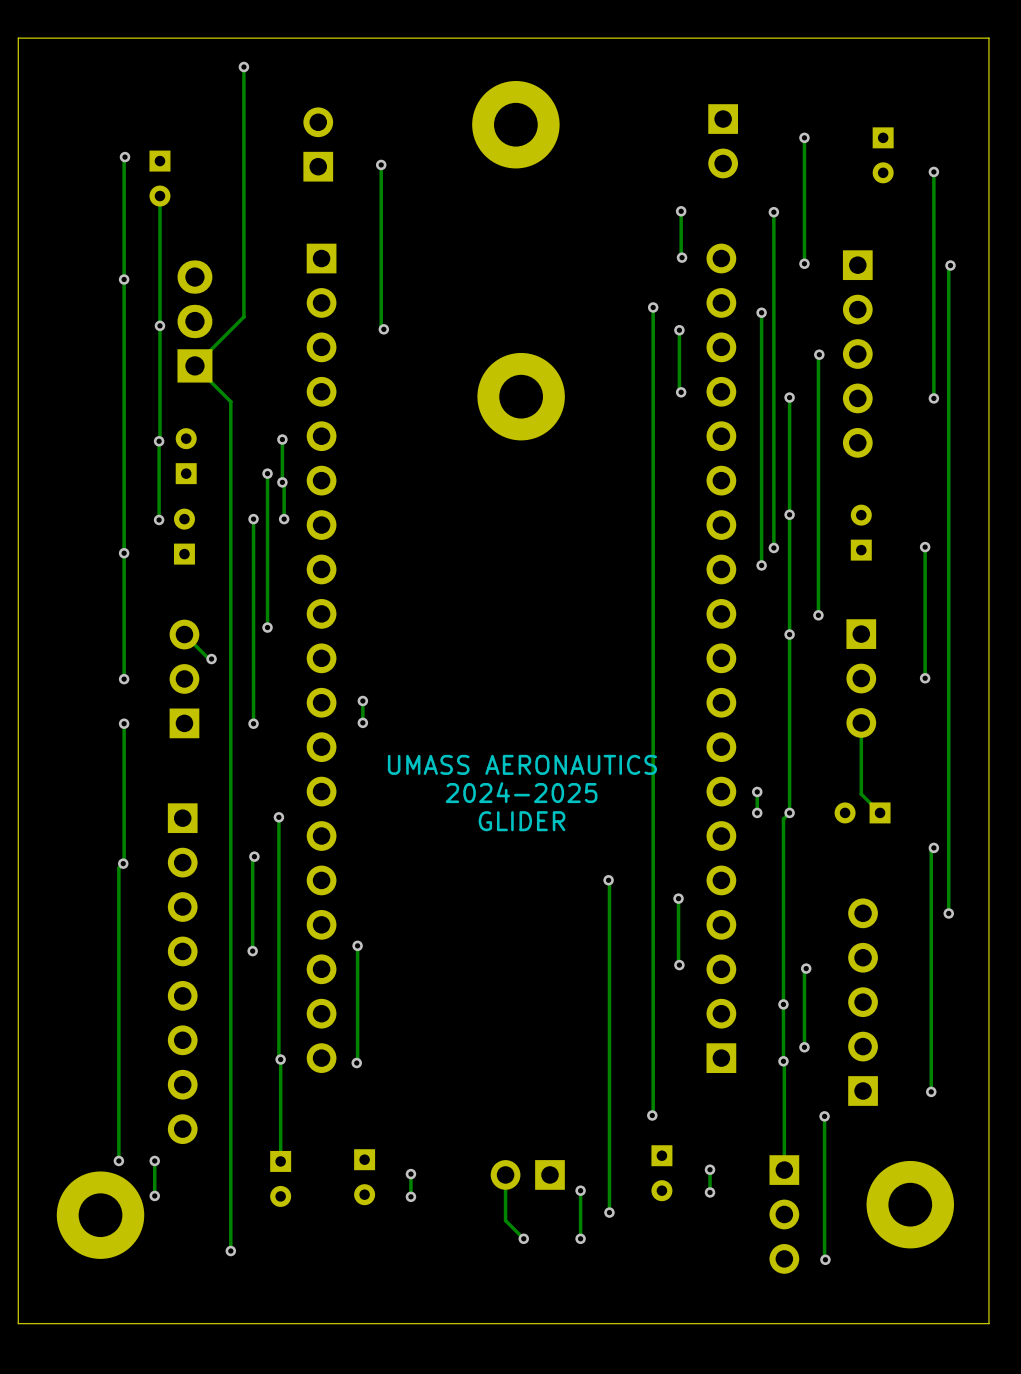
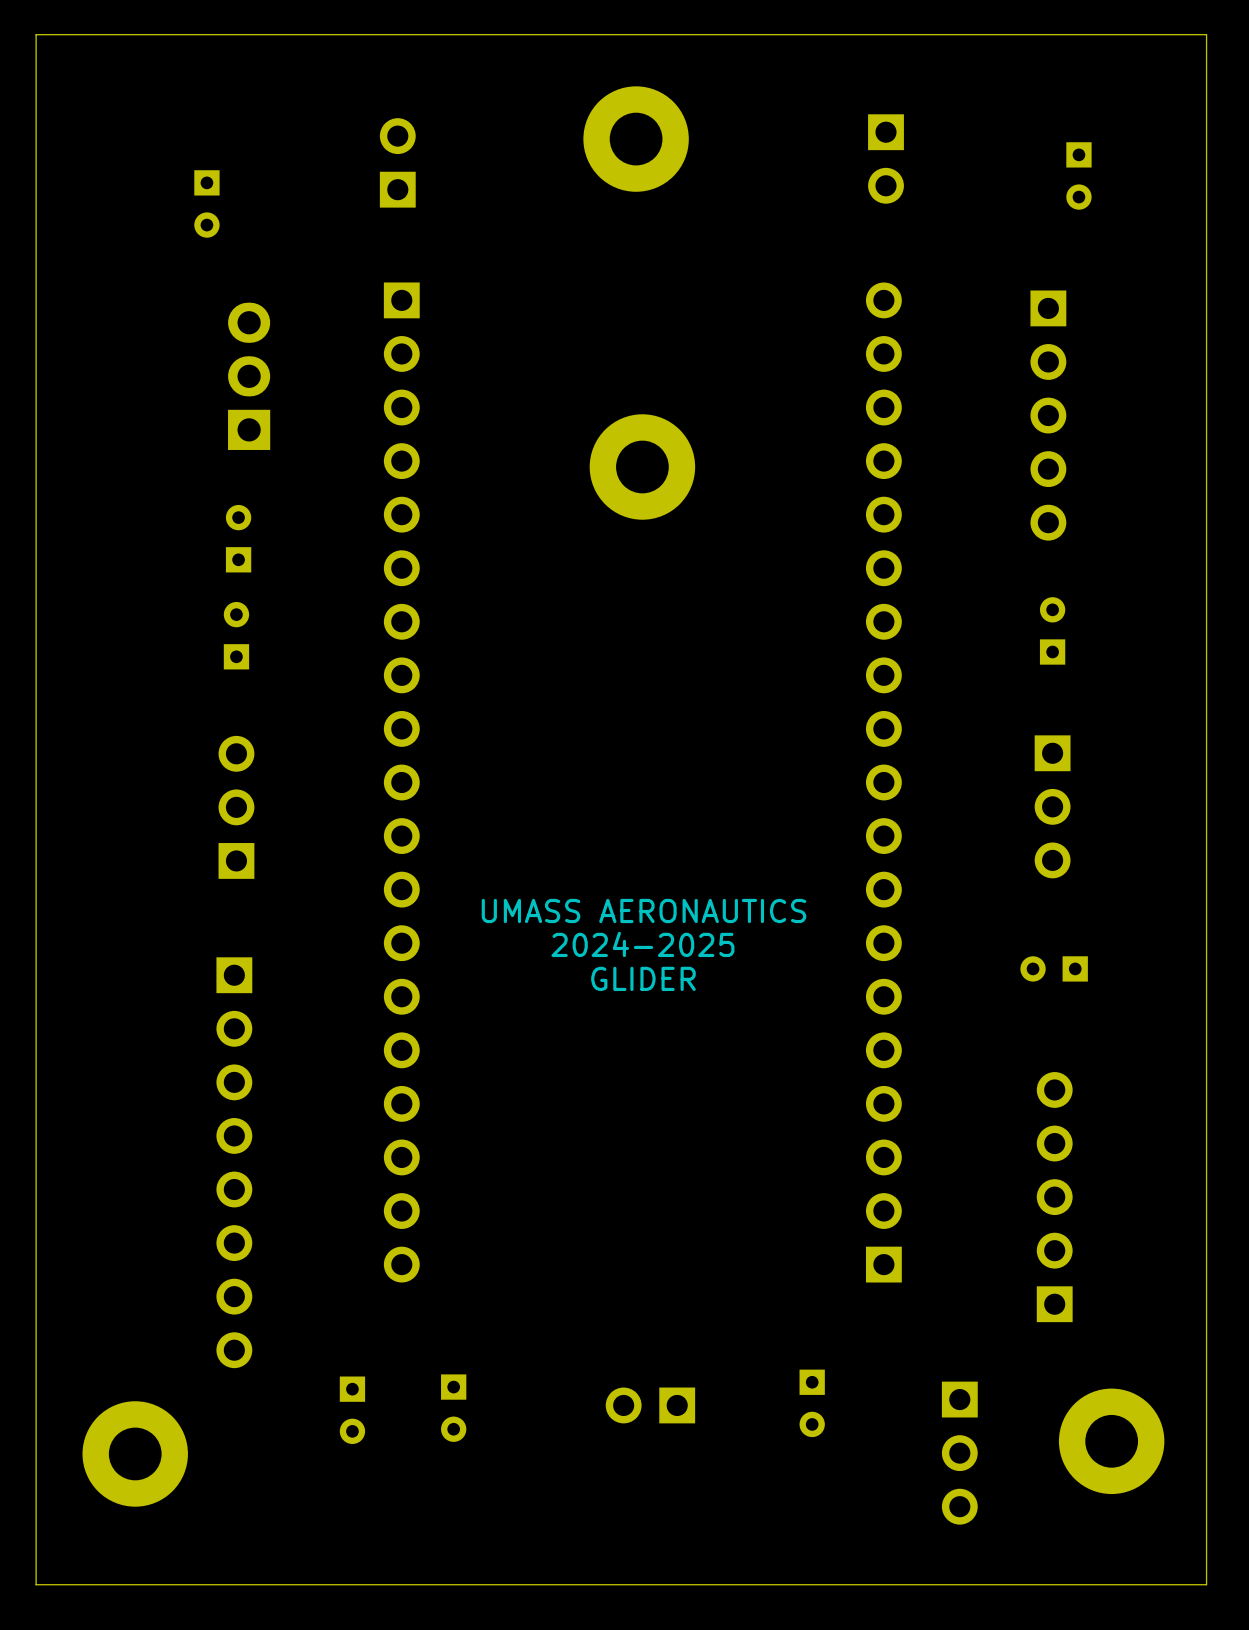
track: (243, 67) (243, 316) (194, 365) (230, 401) (230, 1251) -> none
via: (243, 67) -> none
track: (804, 137) (804, 263) -> none
via: (804, 137) -> none
track: (125, 157) (124, 679) -> none
via: (125, 157) -> none
track: (381, 164) (381, 326) (383, 329) -> none
via: (381, 164) -> none
track: (933, 171) (933, 398) -> none
via: (933, 171) -> none
track: (159, 196) (159, 519) -> none
track: (681, 211) (682, 257) -> none
via: (681, 211) -> none
track: (773, 212) (773, 547) -> none
via: (773, 212) -> none
via: (682, 257) -> none
via: (804, 263) -> none
track: (950, 265) (948, 267) (948, 913) -> none
via: (950, 265) -> none
via: (124, 279) -> none
track: (653, 307) (652, 1115) -> none
via: (653, 307) -> none
track: (761, 312) (761, 565) -> none
via: (761, 312) -> none
via: (159, 325) -> none
via: (383, 329) -> none
track: (679, 330) (679, 390) (681, 392) -> none
via: (679, 330) -> none
track: (819, 354) (818, 615) -> none
via: (819, 354) -> none
via: (681, 392) -> none
track: (789, 397) (789, 812) (783, 819) (784, 1170) -> none
via: (789, 397) -> none
via: (933, 398) -> none
track: (282, 439) (284, 519) -> none
via: (282, 439) -> none
via: (159, 441) -> none
track: (267, 473) (267, 627) -> none
via: (267, 473) -> none
via: (282, 482) -> none
via: (789, 514) -> none
via: (159, 519) -> none
track: (253, 519) (253, 723) -> none
via: (253, 519) -> none
via: (284, 519) -> none
via: (773, 547) -> none
track: (925, 547) (925, 678) -> none
via: (925, 547) -> none
via: (124, 553) -> none
via: (761, 565) -> none
via: (818, 615) -> none
via: (267, 627) -> none
track: (184, 634) (208, 659) (211, 659) -> none
via: (789, 634) -> none
via: (211, 659) -> none
via: (925, 678) -> none
via: (124, 679) -> none
track: (362, 701) (362, 722) -> none
via: (362, 701) -> none
via: (362, 722) -> none
track: (861, 722) (861, 794) (880, 812) -> none
track: (124, 723) (124, 862) (118, 868) (118, 1160) -> none
via: (124, 723) -> none
via: (253, 723) -> none
track: (757, 791) (757, 812) -> none
via: (757, 791) -> none
via: (757, 812) -> none
via: (789, 812) -> none
track: (278, 817) (280, 1161) -> none
via: (278, 817) -> none
track: (933, 847) (931, 850) (931, 1091) -> none
via: (933, 847) -> none
track: (254, 856) (252, 858) (252, 951) -> none
via: (254, 856) -> none
via: (123, 863) -> none
track: (608, 880) (609, 1212) -> none
via: (608, 880) -> none
track: (678, 898) (679, 965) -> none
via: (678, 898) -> none
via: (948, 913) -> none
track: (357, 945) (356, 1063) -> none
via: (357, 945) -> none
via: (252, 951) -> none
via: (679, 965) -> none
track: (806, 968) (804, 970) (804, 1047) -> none
via: (806, 968) -> none
via: (783, 1004) -> none
via: (804, 1047) -> none
via: (280, 1059) -> none
via: (783, 1061) -> none
via: (356, 1063) -> none
via: (931, 1091) -> none
via: (652, 1115) -> none
track: (824, 1116) (825, 1259) -> none
via: (824, 1116) -> none
via: (118, 1160) -> none
track: (154, 1160) (154, 1195) -> none
via: (154, 1160) -> none
track: (710, 1169) (710, 1192) -> none
via: (710, 1169) -> none
track: (410, 1174) (410, 1196) -> none
via: (410, 1174) -> none
track: (505, 1174) (505, 1220) (523, 1238) -> none
track: (580, 1190) (580, 1238) -> none
via: (580, 1190) -> none
via: (710, 1192) -> none
via: (154, 1195) -> none
via: (410, 1196) -> none
via: (609, 1212) -> none
via: (523, 1238) -> none
via: (580, 1238) -> none
via: (230, 1251) -> none
via: (825, 1259) -> none

